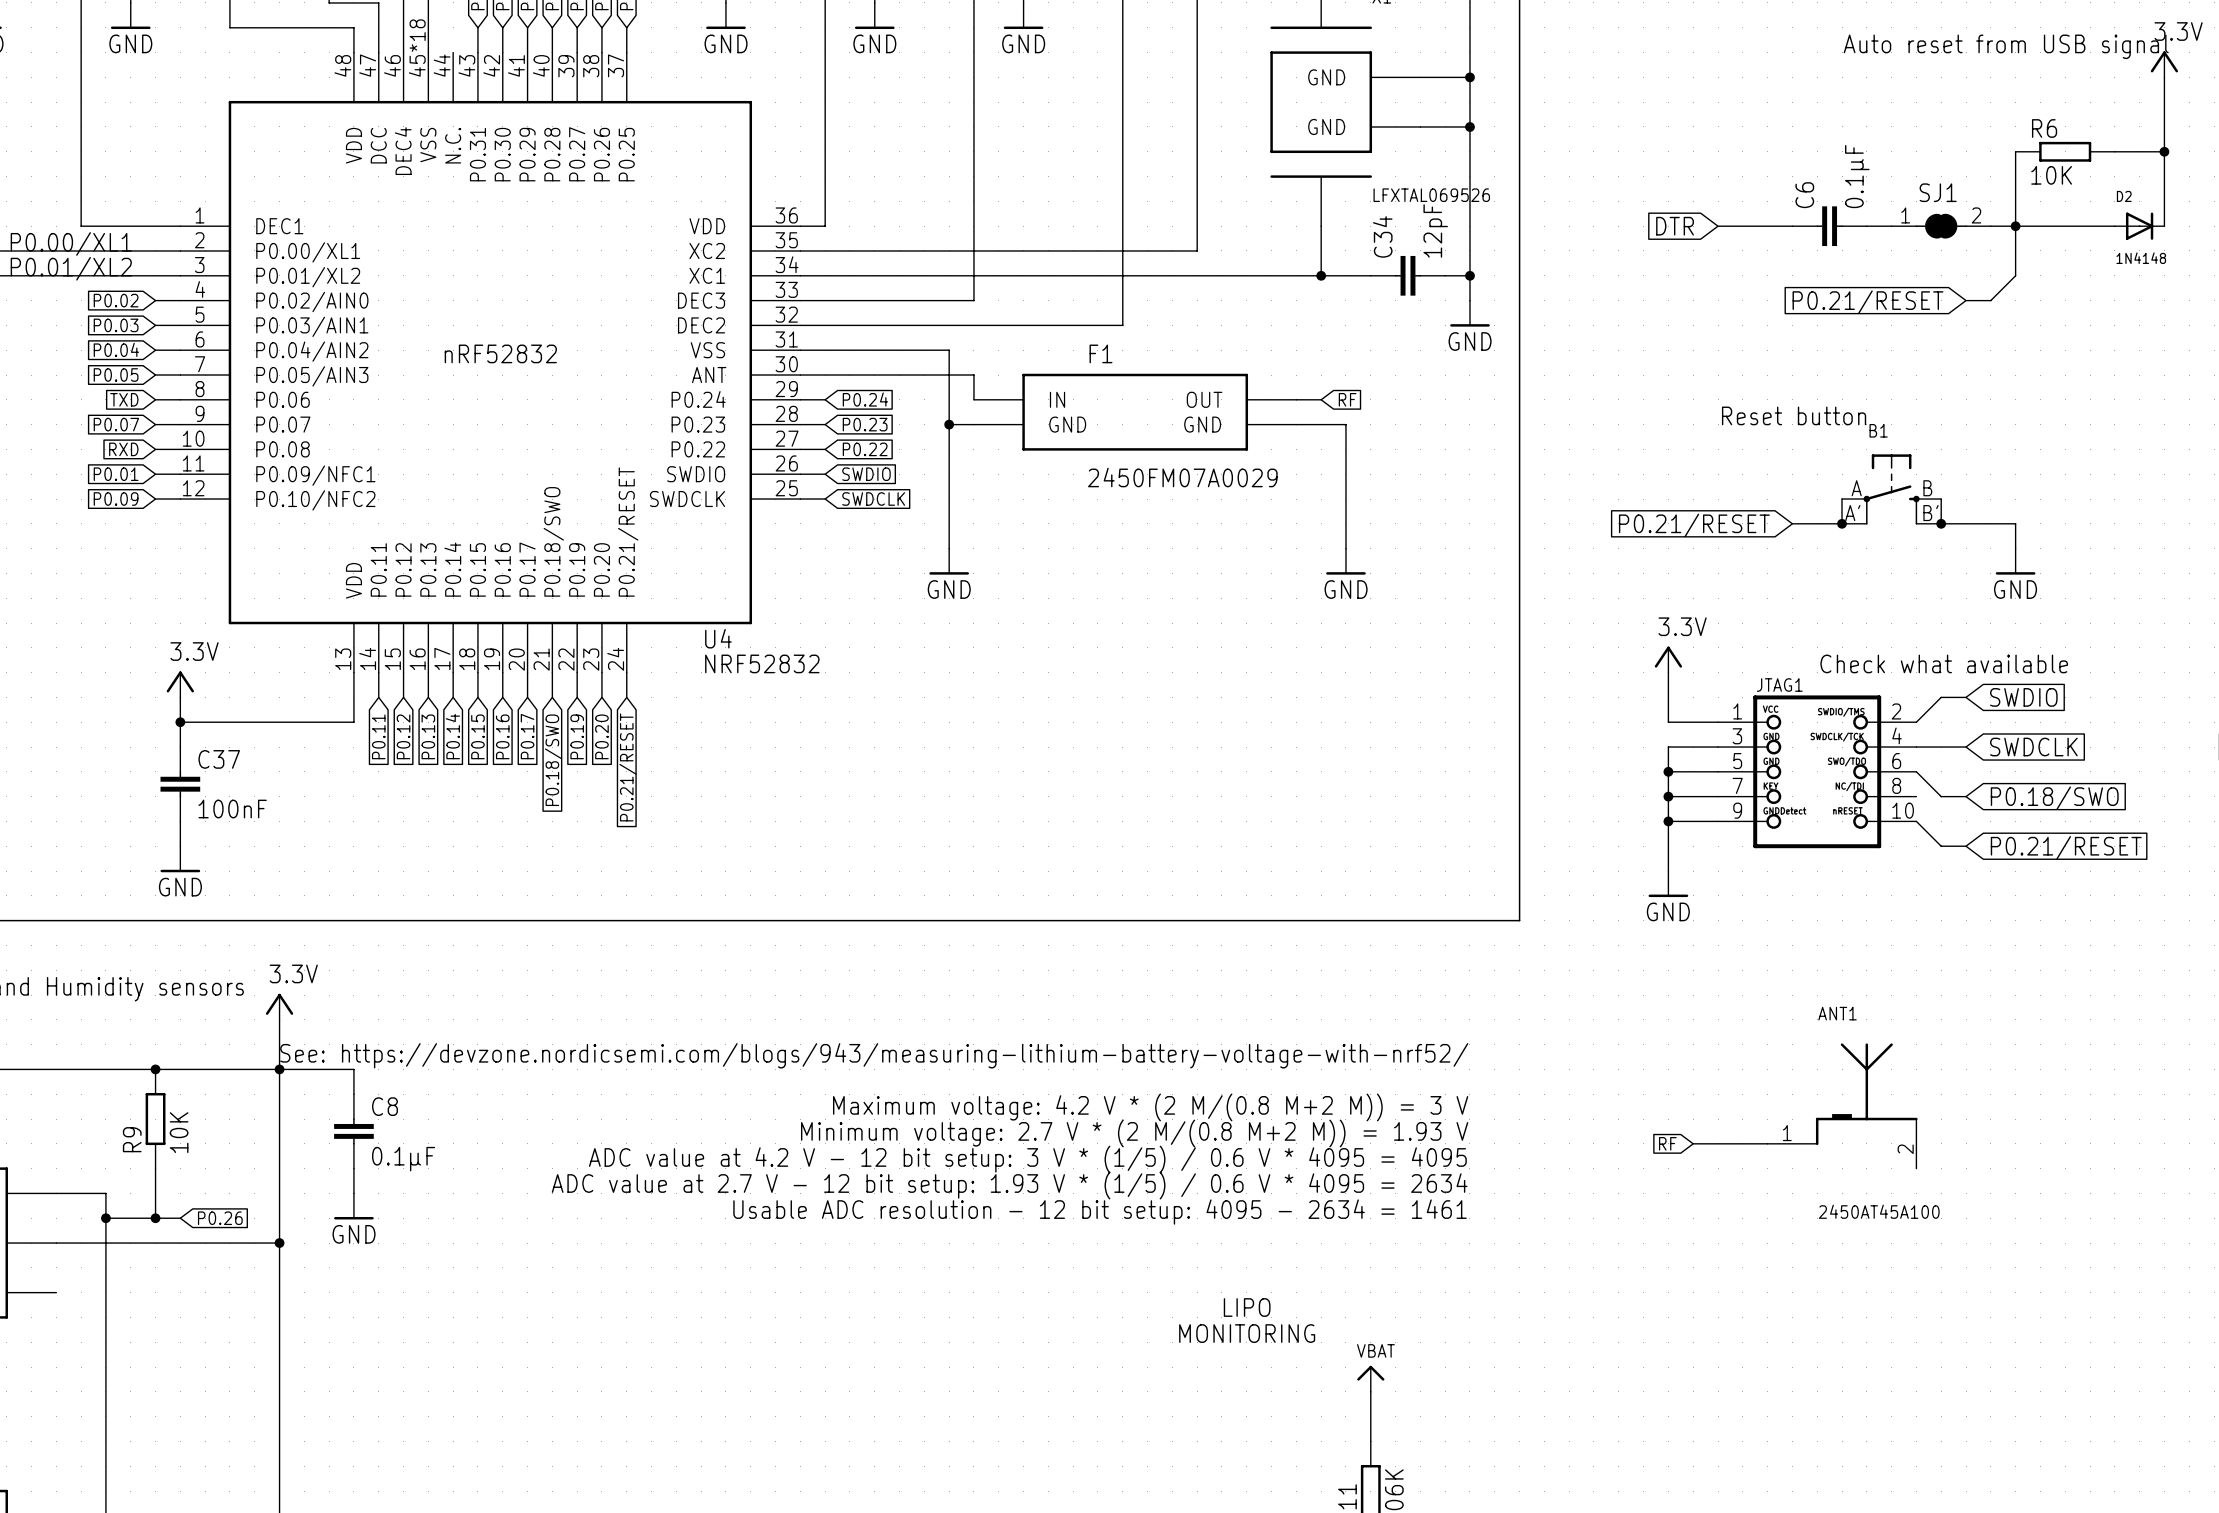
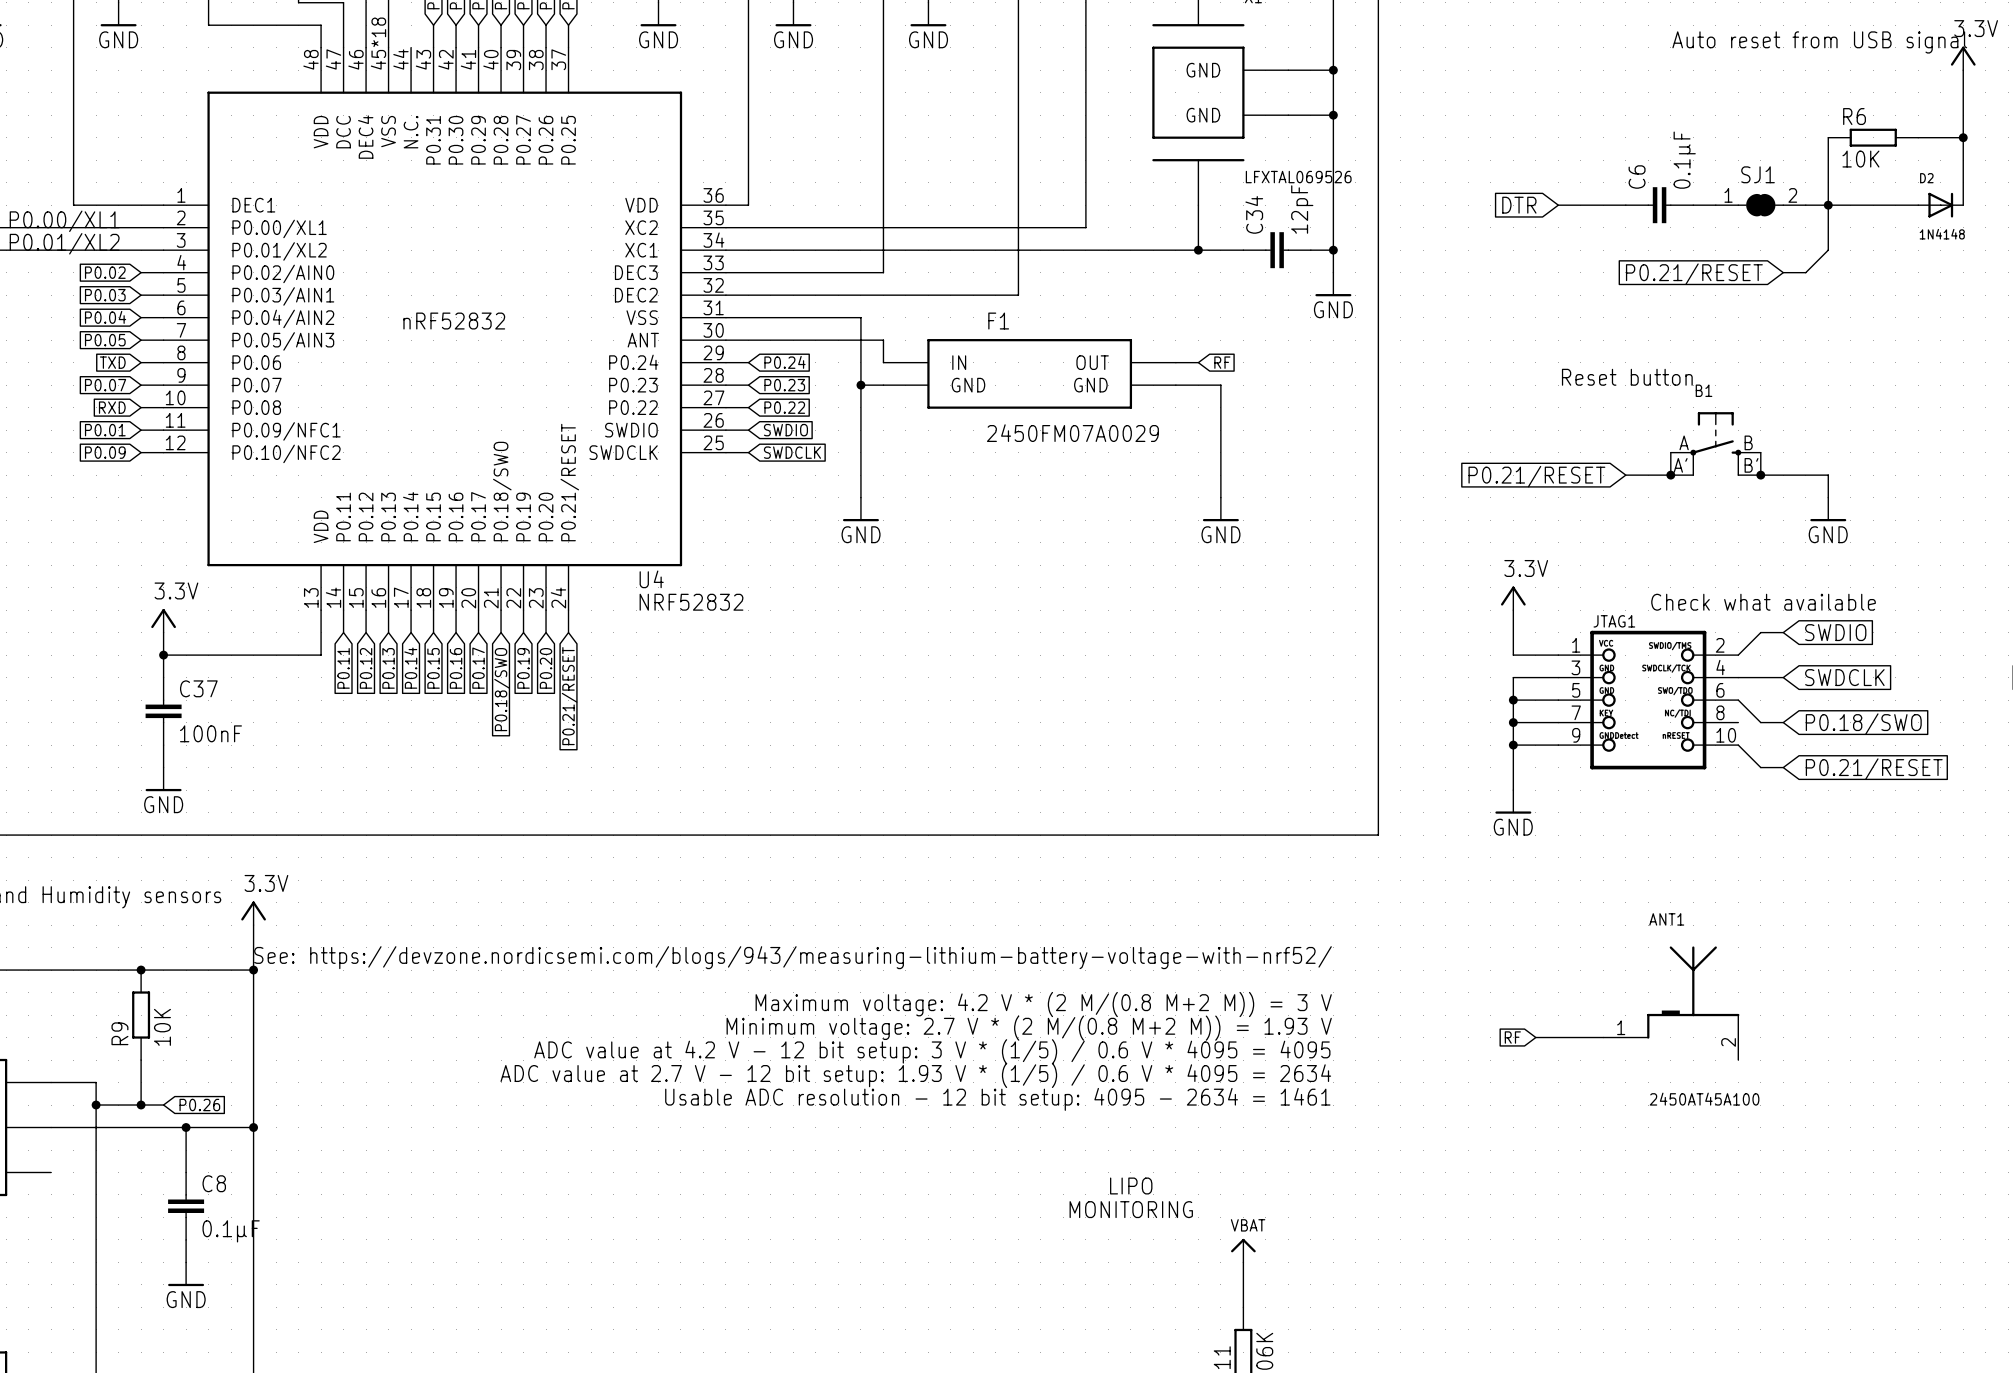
wire: (279, 1069) (353, 1069) (353, 1094) -> none
C8 position: (353, 1131) -> (186, 1206)
wire: (353, 1168) (353, 1193) -> none
power symbol: GND (353, 1206) -> none
wire: none -> (186, 1127) (186, 1172)
junction: none -> (186, 1127)
wire: none -> (186, 1239) (186, 1262)
power symbol: none -> GND (186, 1274)

